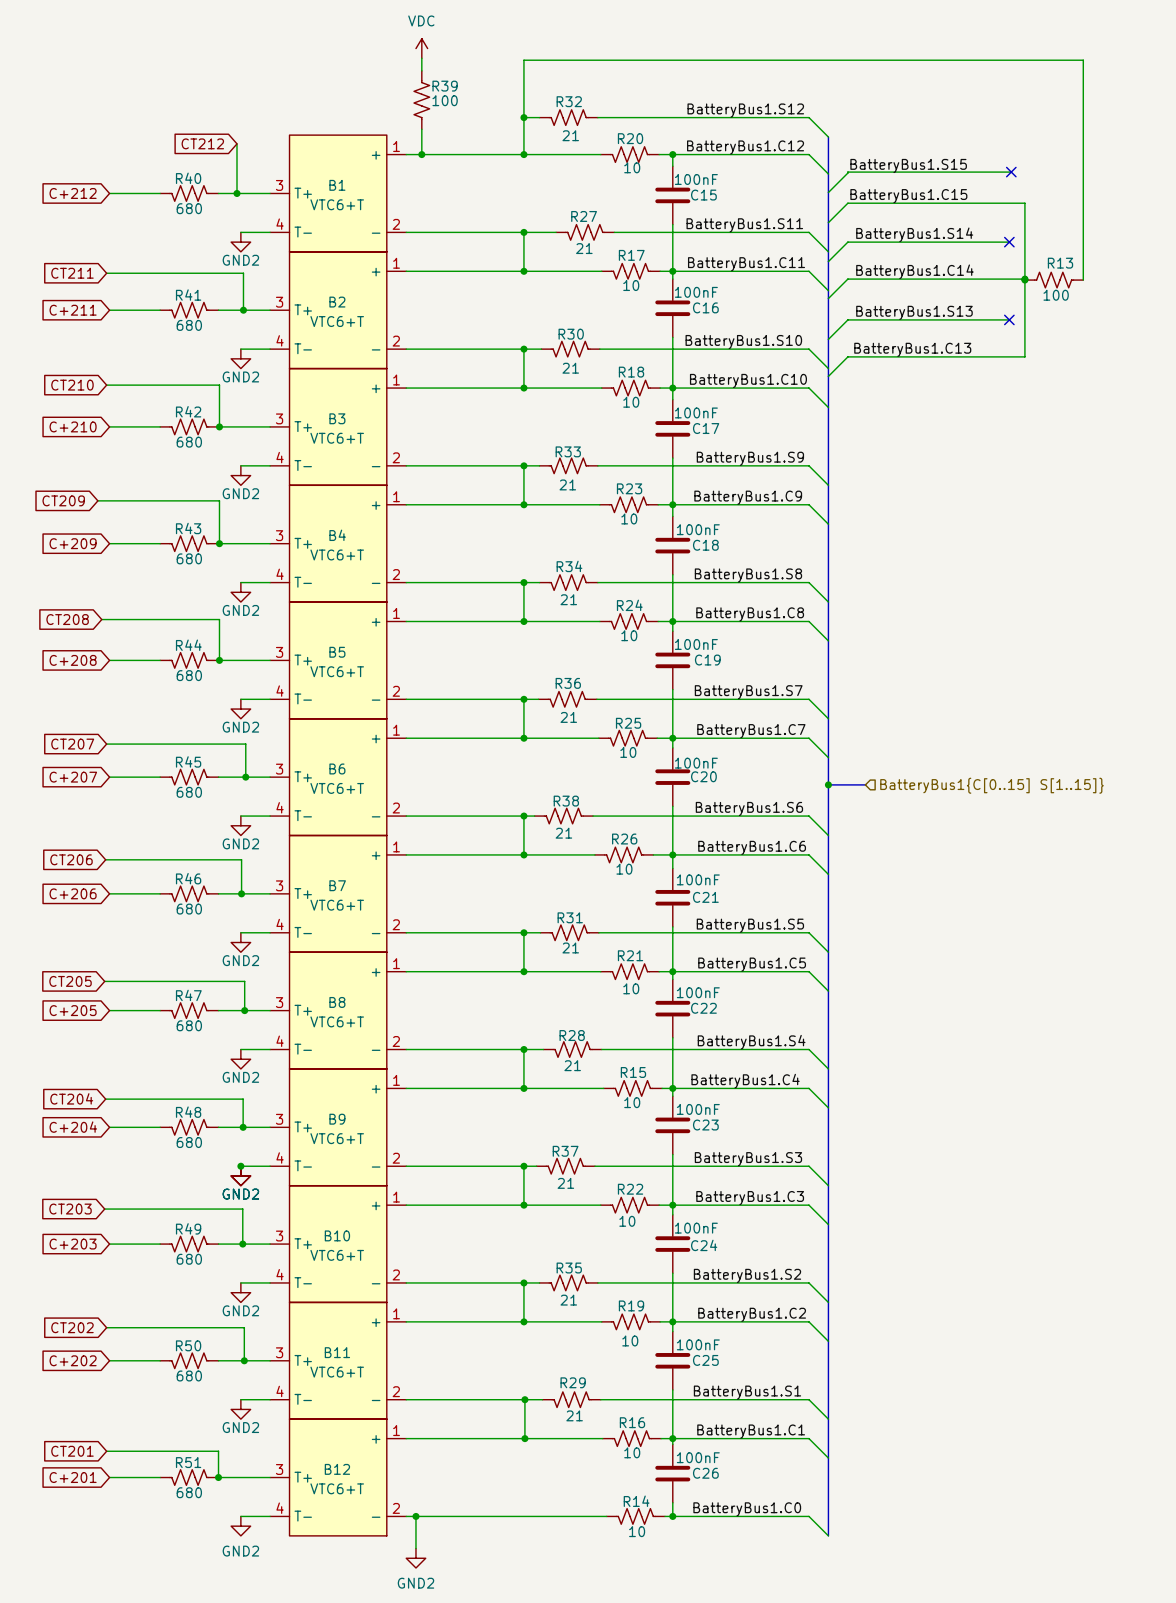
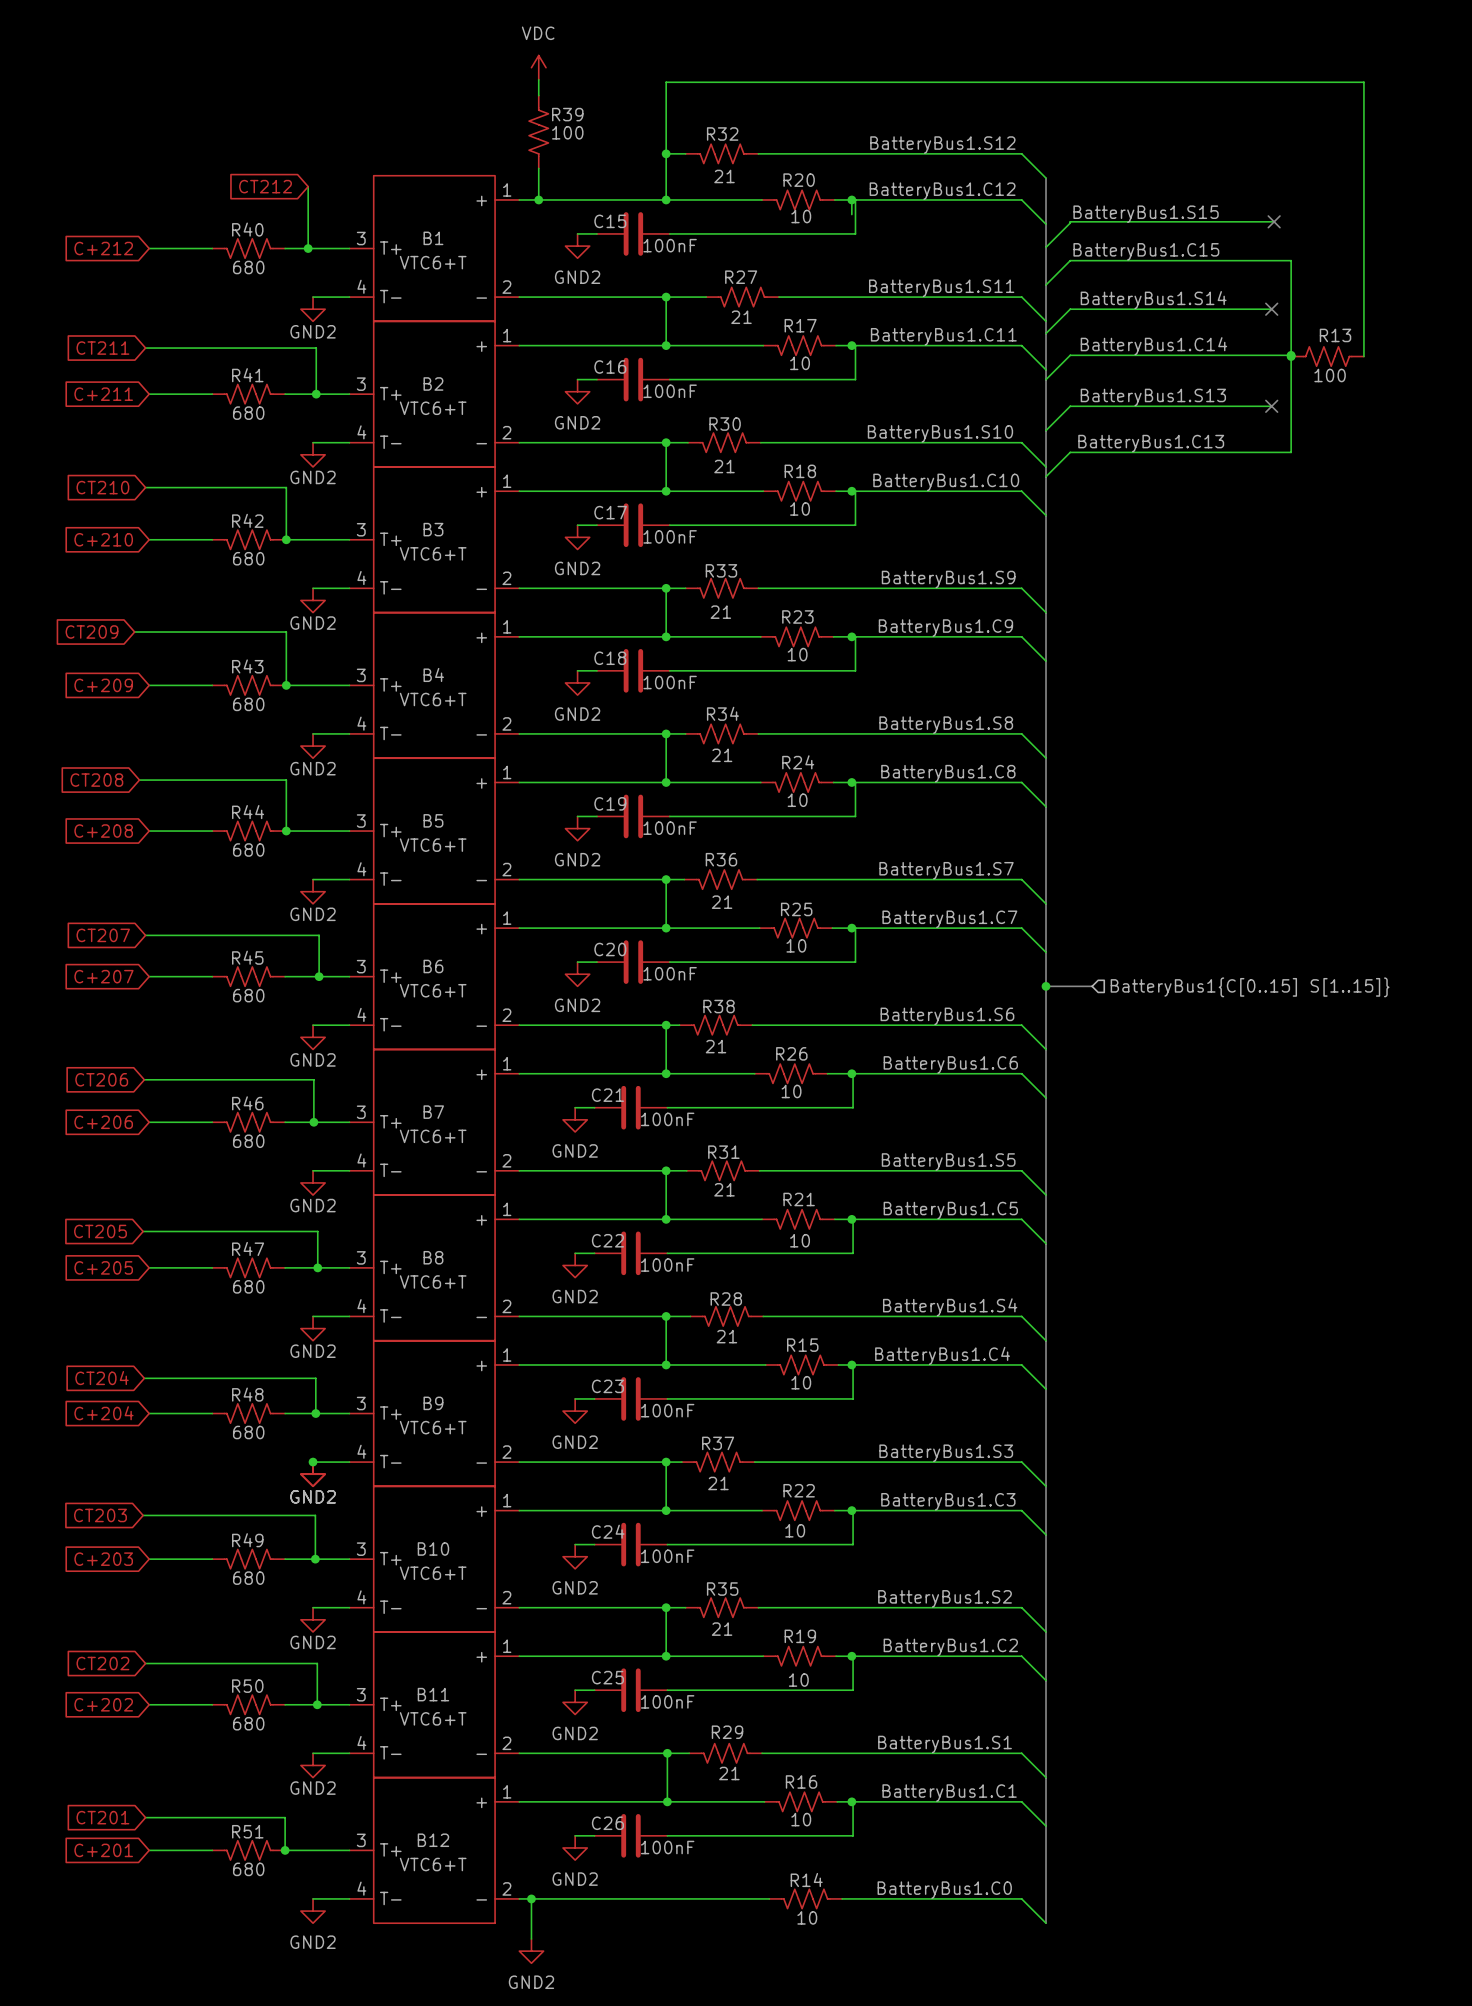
wire: none -> (855, 199) (855, 233) (669, 233)
C15 value position: 100nF (696, 179) -> 100nF (670, 245)
wire: none -> (577, 233) (596, 233)
power symbol: none -> GND2 (577, 246)
C15 rotation: 0° (672, 195) -> 90° clockwise (633, 233)
C15 position: (672, 195) -> (633, 233)
C15 name position: C15 (703, 195) -> C15 (610, 221)
wire: (672, 224) (672, 279) -> none
wire: none -> (855, 345) (855, 379) (669, 379)
C16 value position: 100nF (696, 292) -> 100nF (670, 391)
wire: none -> (577, 379) (596, 379)
C16 name position: C16 (705, 307) -> C16 (610, 367)
power symbol: none -> GND2 (577, 391)
C16 rotation: 0° (672, 308) -> 90° clockwise (633, 379)
C16 position: (672, 308) -> (633, 379)
wire: (672, 337) (672, 399) -> none
wire: none -> (855, 491) (855, 525) (669, 525)
C17 value position: 100nF (696, 412) -> 100nF (670, 536)
wire: none -> (577, 525) (596, 525)
power symbol: none -> GND2 (577, 537)
C17 rotation: 0° (672, 428) -> 90° clockwise (633, 525)
C17 position: (672, 428) -> (633, 525)
C17 name position: C17 (706, 428) -> C17 (610, 512)
wire: (672, 458) (672, 516) -> none
wire: none -> (855, 636) (855, 670) (669, 670)
C18 value position: 100nF (698, 529) -> 100nF (670, 682)
wire: none -> (577, 670) (596, 670)
power symbol: none -> GND2 (577, 682)
C18 rotation: 0° (672, 545) -> 90° clockwise (633, 670)
C18 position: (672, 545) -> (633, 670)
C18 name position: C18 (705, 545) -> C18 (610, 658)
wire: (672, 574) (672, 631) -> none
wire: none -> (855, 782) (855, 816) (669, 816)
C19 value position: 100nF (696, 644) -> 100nF (670, 828)
wire: none -> (577, 816) (596, 816)
power symbol: none -> GND2 (577, 828)
C19 rotation: 0° (672, 660) -> 90° clockwise (633, 816)
C19 position: (672, 660) -> (633, 816)
C19 name position: C19 (707, 660) -> C19 (610, 803)
wire: (672, 689) (672, 747) -> none
wire: none -> (855, 928) (855, 962) (669, 962)
C20 value position: 100nF (696, 763) -> 100nF (670, 973)
wire: none -> (577, 962) (596, 962)
power symbol: none -> GND2 (577, 974)
C20 name position: C20 (703, 776) -> C20 (610, 949)
C20 rotation: 0° (672, 777) -> 90° clockwise (633, 962)
C20 position: (672, 777) -> (633, 962)
wire: (672, 806) (672, 868) -> none
wire: none -> (853, 1073) (853, 1107) (667, 1107)
C21 value position: 100nF (698, 879) -> 100nF (667, 1119)
wire: none -> (575, 1107) (594, 1107)
power symbol: none -> GND2 (575, 1119)
C21 rotation: 0° (672, 897) -> 90° clockwise (630, 1107)
C21 position: (672, 897) -> (630, 1107)
C21 name position: C21 (705, 897) -> C21 (607, 1095)
wire: (672, 926) (672, 979) -> none
wire: none -> (853, 1219) (853, 1253) (667, 1253)
C22 value position: 100nF (698, 992) -> 100nF (667, 1265)
wire: none -> (575, 1253) (594, 1253)
power symbol: none -> GND2 (575, 1265)
C22 rotation: 0° (672, 1008) -> 90° clockwise (630, 1253)
C22 position: (672, 1008) -> (630, 1253)
C22 name position: C22 (703, 1008) -> C22 (607, 1240)
wire: (672, 1037) (672, 1096) -> none
wire: none -> (853, 1364) (853, 1398) (667, 1398)
C23 value position: 100nF (698, 1109) -> 100nF (667, 1410)
wire: none -> (575, 1398) (594, 1398)
power symbol: none -> GND2 (575, 1411)
C23 rotation: 0° (672, 1125) -> 90° clockwise (630, 1398)
C23 position: (672, 1125) -> (630, 1398)
C23 name position: C23 (705, 1125) -> C23 (607, 1386)
wire: (672, 1154) (672, 1214) -> none
wire: none -> (853, 1510) (853, 1544) (667, 1544)
C24 value position: 100nF (696, 1228) -> 100nF (667, 1556)
wire: none -> (575, 1544) (594, 1544)
power symbol: none -> GND2 (575, 1556)
C24 rotation: 0° (672, 1244) -> 90° clockwise (630, 1544)
C24 position: (672, 1244) -> (630, 1544)
C24 name position: C24 (704, 1245) -> C24 (608, 1531)
wire: (672, 1273) (672, 1331) -> none
wire: none -> (853, 1656) (853, 1690) (667, 1690)
C25 value position: 100nF (698, 1344) -> 100nF (667, 1701)
wire: none -> (575, 1690) (594, 1690)
power symbol: none -> GND2 (575, 1702)
C25 rotation: 0° (672, 1360) -> 90° clockwise (630, 1690)
C25 position: (672, 1360) -> (630, 1690)
C25 name position: C25 (705, 1360) -> C25 (607, 1677)
wire: (672, 1389) (672, 1444) -> none
wire: none -> (853, 1801) (853, 1835) (667, 1835)
C26 value position: 100nF (698, 1457) -> 100nF (667, 1847)
wire: none -> (575, 1835) (594, 1835)
C26 rotation: 0° (672, 1473) -> 90° clockwise (630, 1835)
C26 position: (672, 1473) -> (630, 1835)
C26 name position: C26 (705, 1473) -> C26 (607, 1823)
power symbol: none -> GND2 (575, 1847)
wire: (672, 1502) (672, 1516) -> none
junction: (672, 1516) -> none

